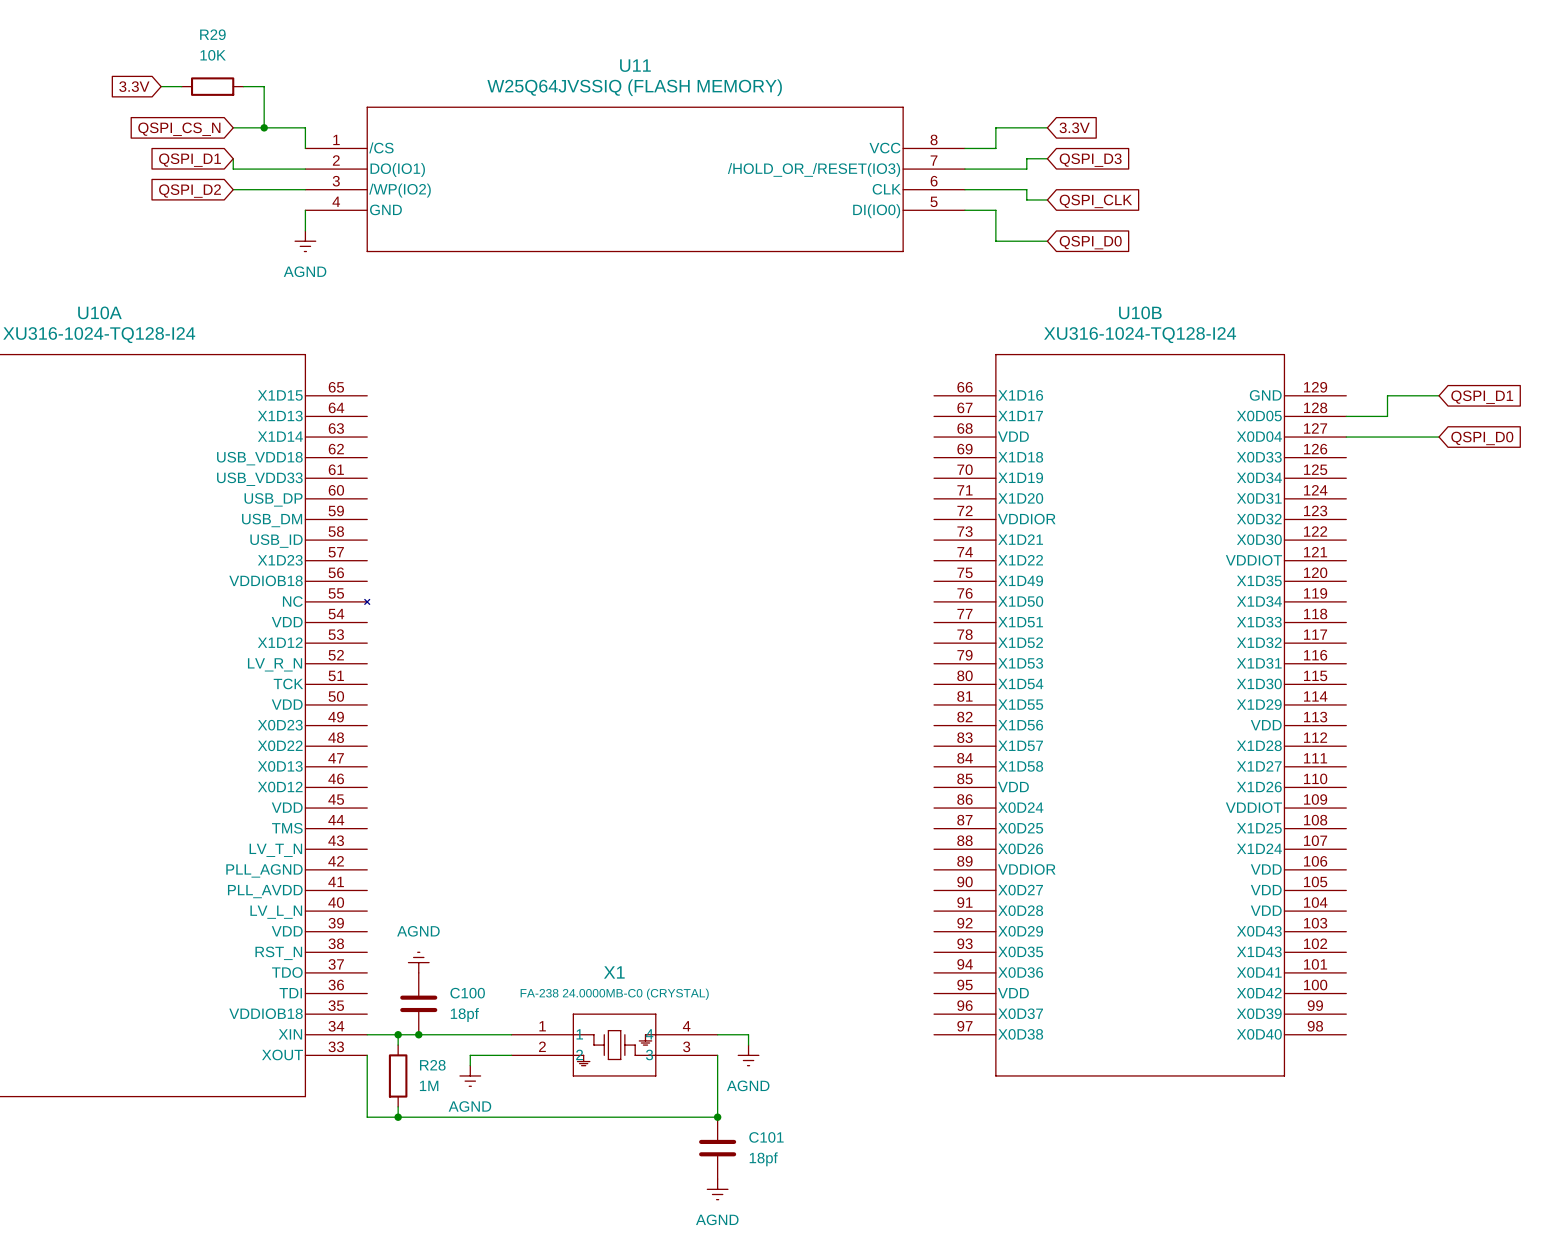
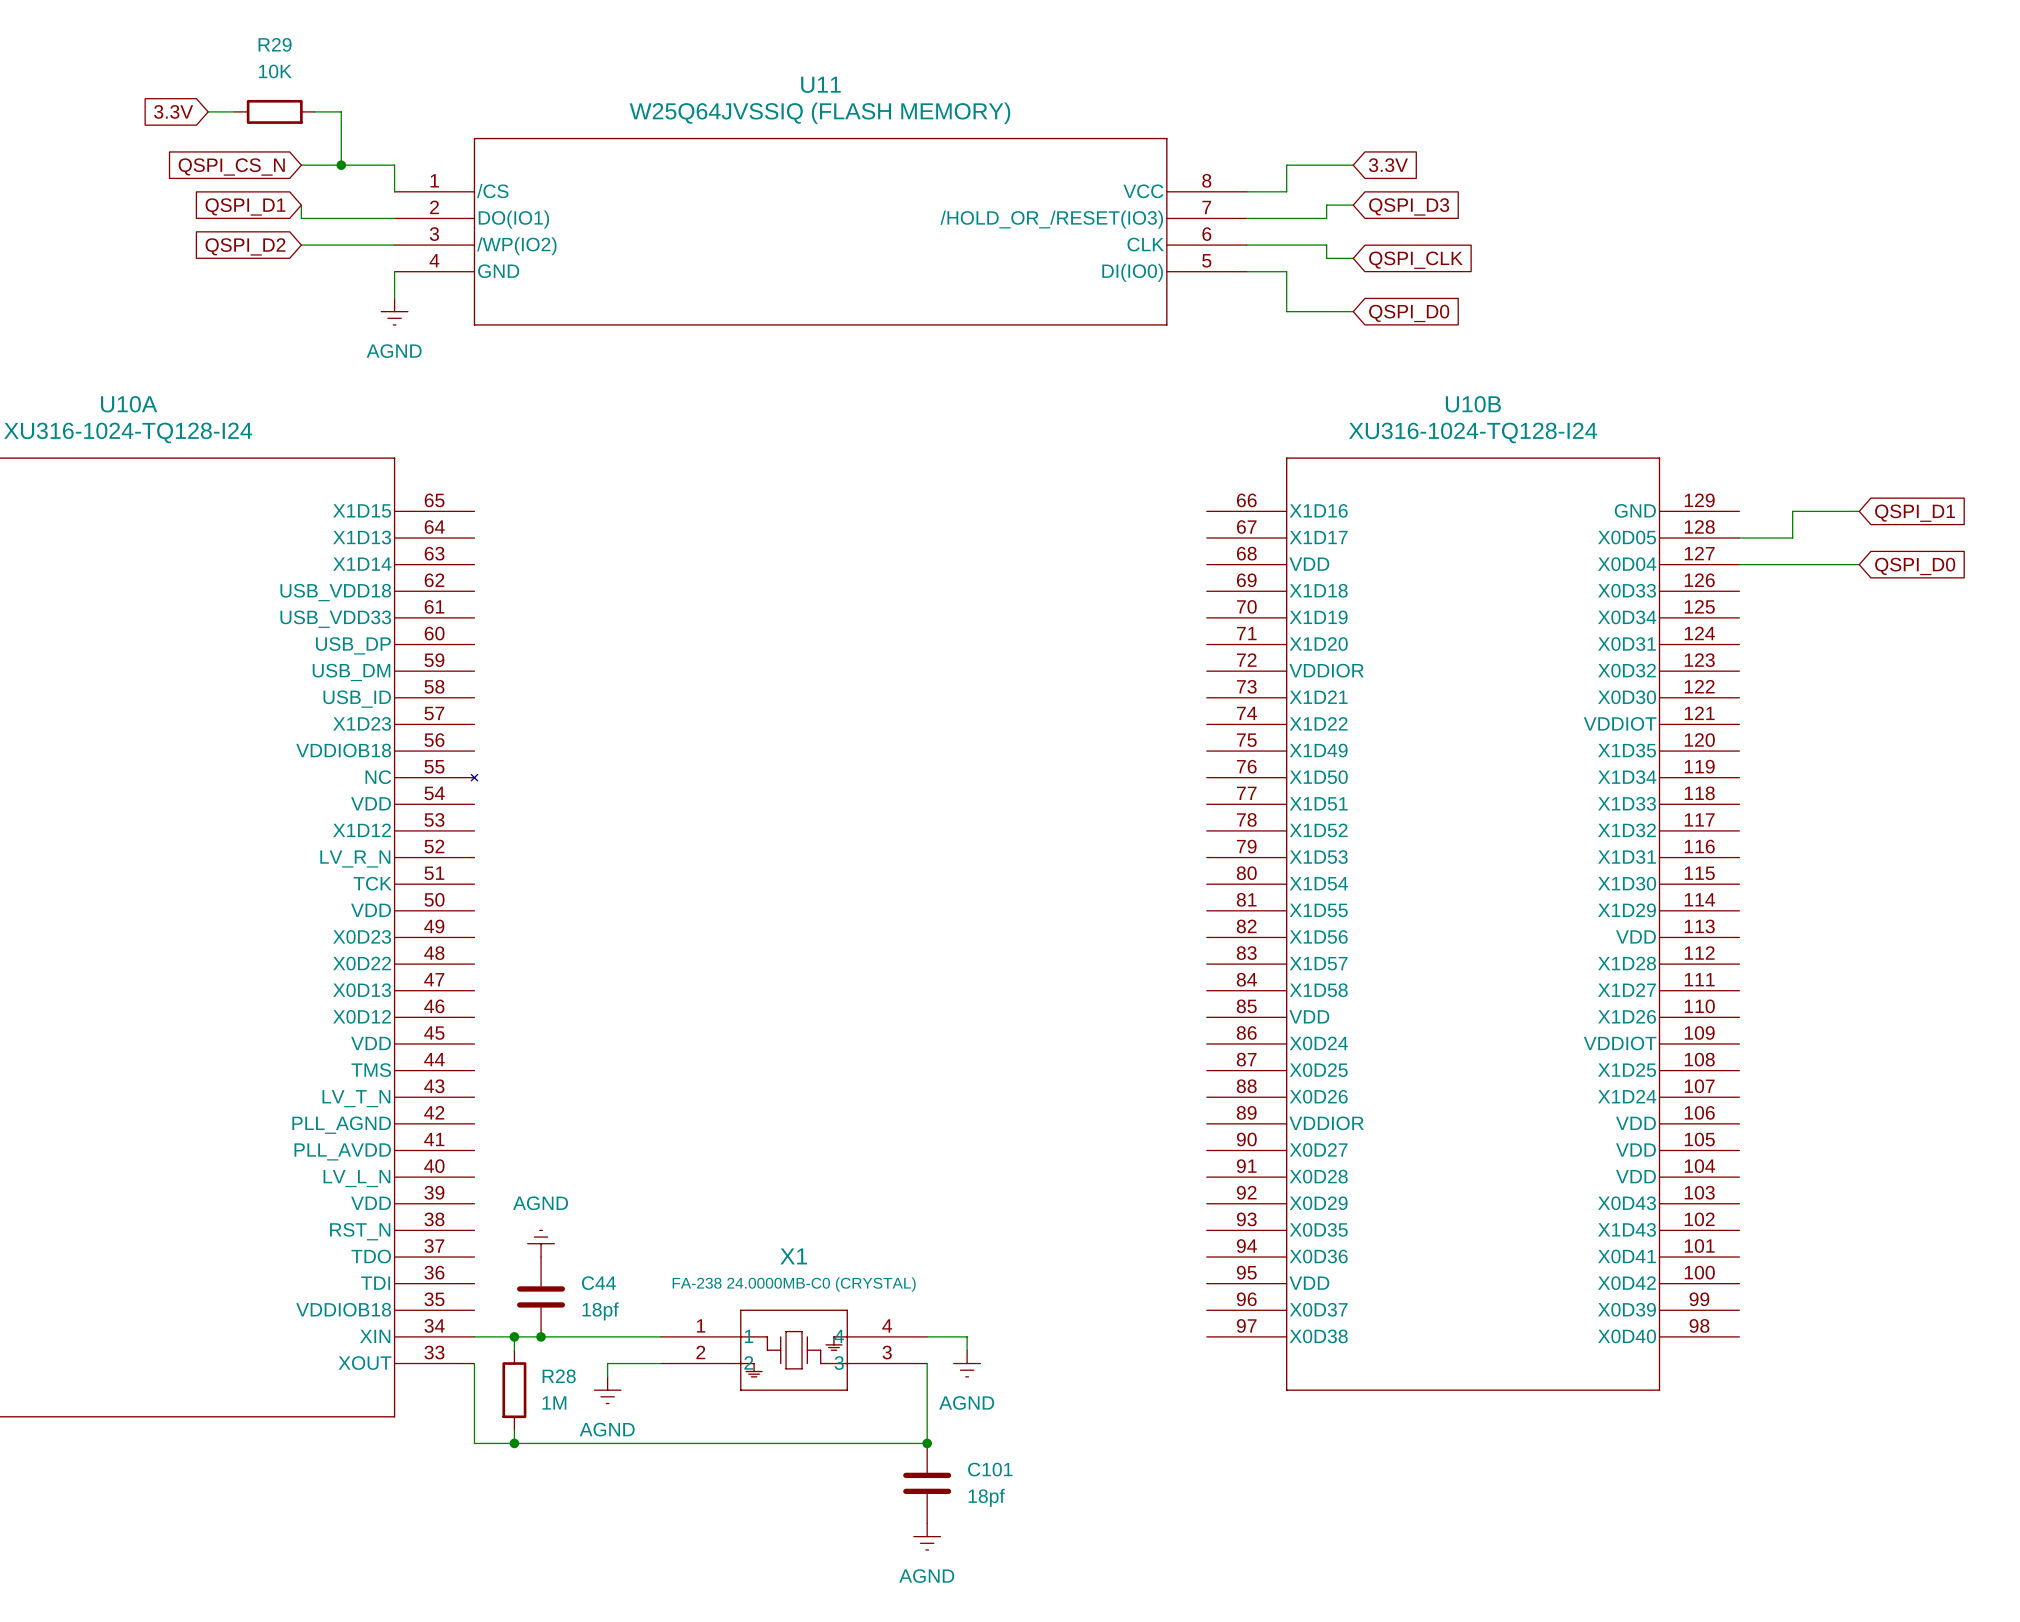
C100 name: C100 (467, 993) -> C44 (598, 1283)

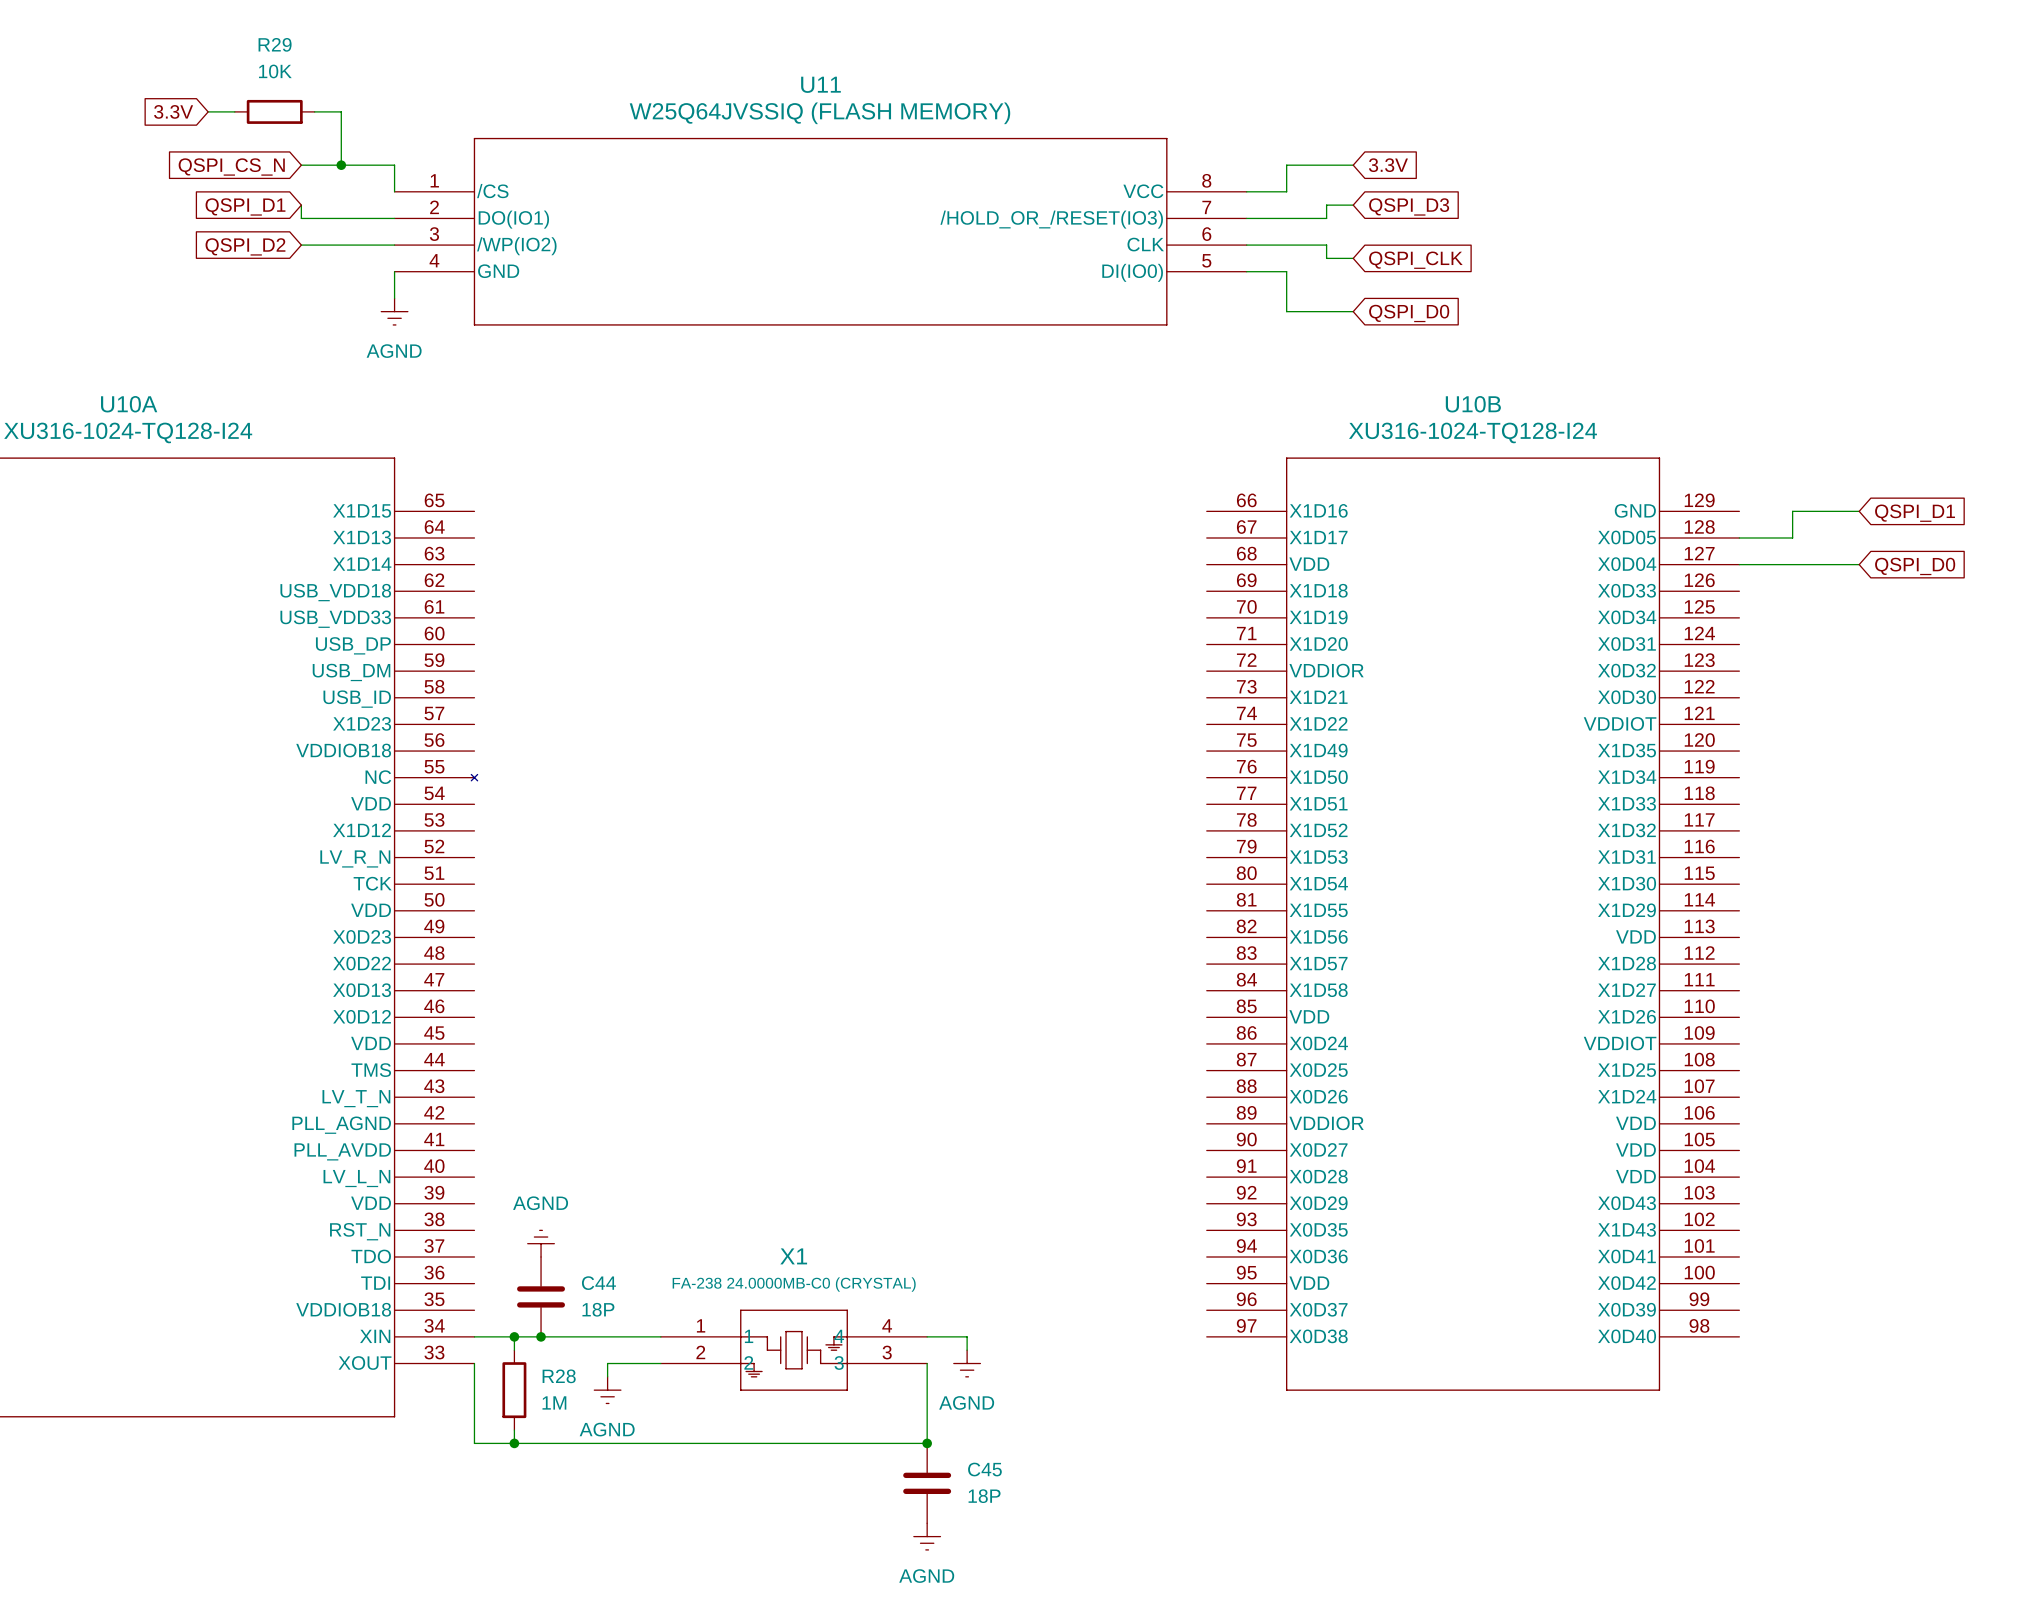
C44 value: 18pf (600, 1311) -> 18P (598, 1309)
C101 name: C101 (990, 1469) -> C45 (984, 1469)
C101 value: 18pf (986, 1497) -> 18P (984, 1496)

